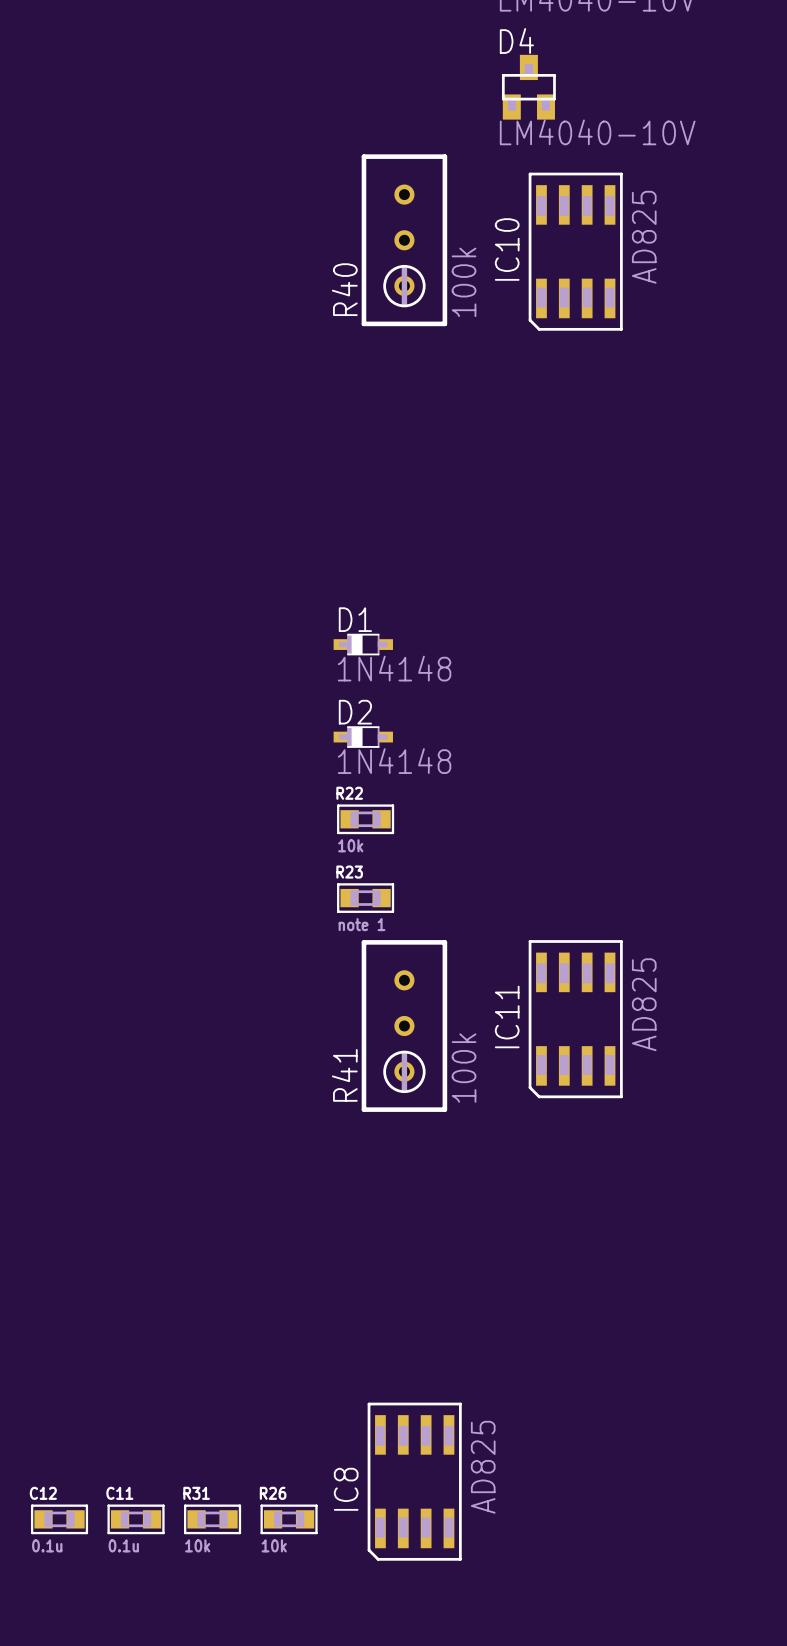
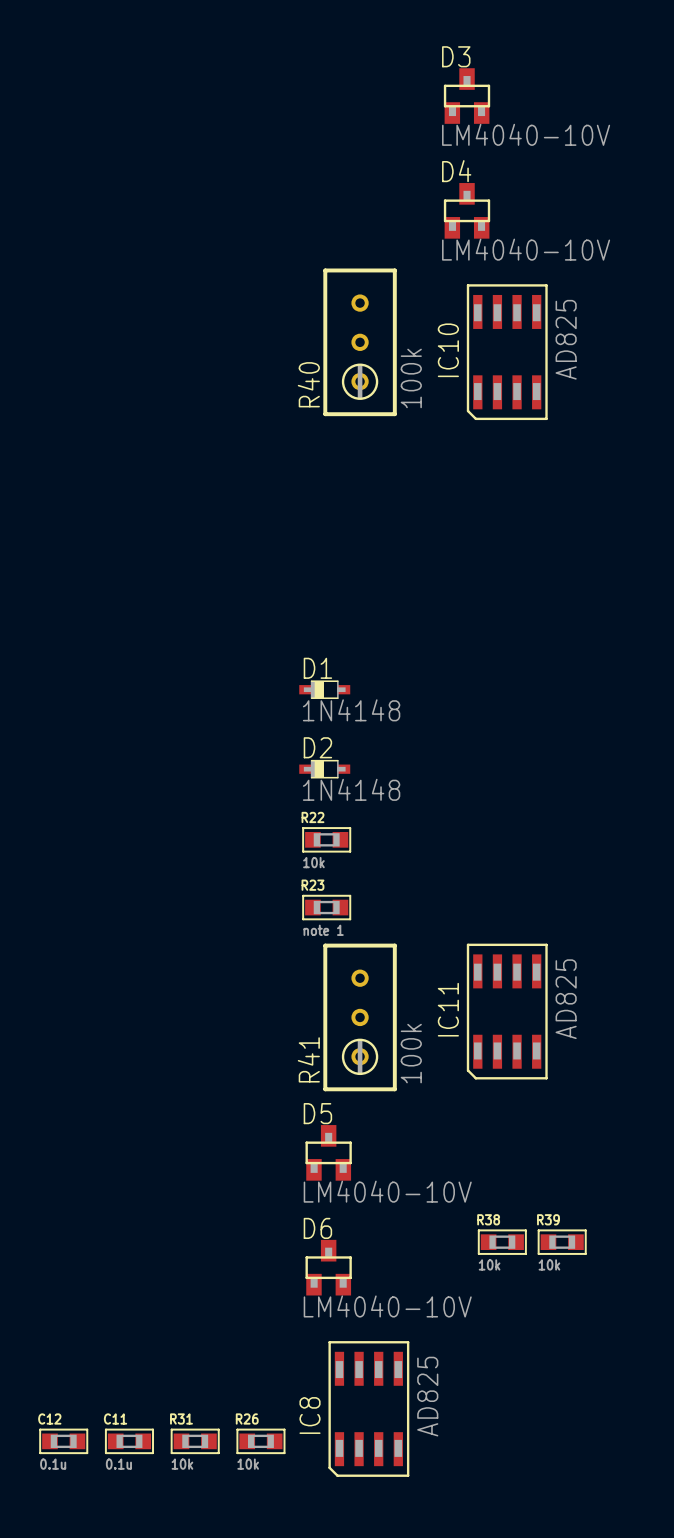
D5: none -> LM4040-10V (328, 1152)
R38: none -> 10k (502, 1242)
R39: none -> 10k (562, 1242)
D6: none -> LM4040-10V (328, 1267)

